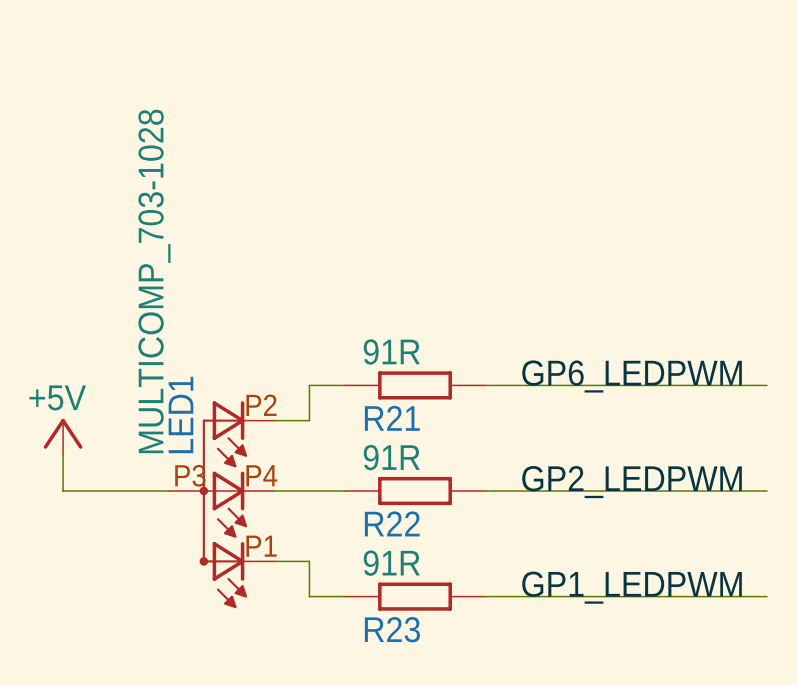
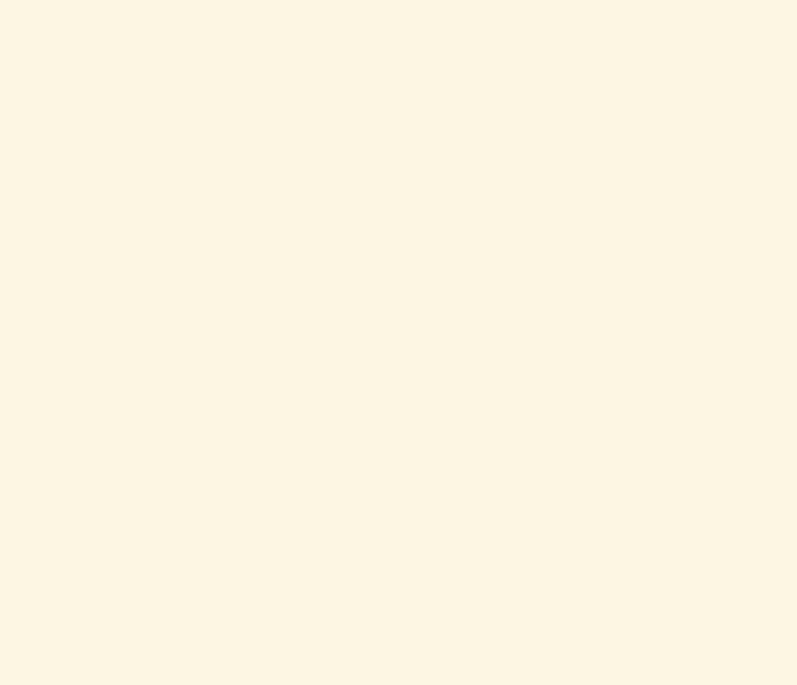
label: GP6_LEDPWM (632, 376) -> none
wire: (344, 385) (309, 385) (309, 420) (274, 420) -> none
R21: 91R (415, 385) -> none
wire: (485, 385) (766, 385) -> none
power symbol: +5V (63, 437) -> none
wire: (63, 455) (63, 491) (168, 491) -> none
label: GP2_LEDPWM (632, 482) -> none
wire: (274, 491) (344, 491) -> none
R22: 91R (415, 491) -> none
wire: (485, 491) (766, 491) -> none
LED1: MULTICOMP_703-1028 (221, 504) -> none
wire: (274, 561) (309, 561) (309, 596) (344, 596) -> none
label: GP1_LEDPWM (632, 587) -> none
R23: 91R (415, 596) -> none
wire: (485, 596) (766, 596) -> none

